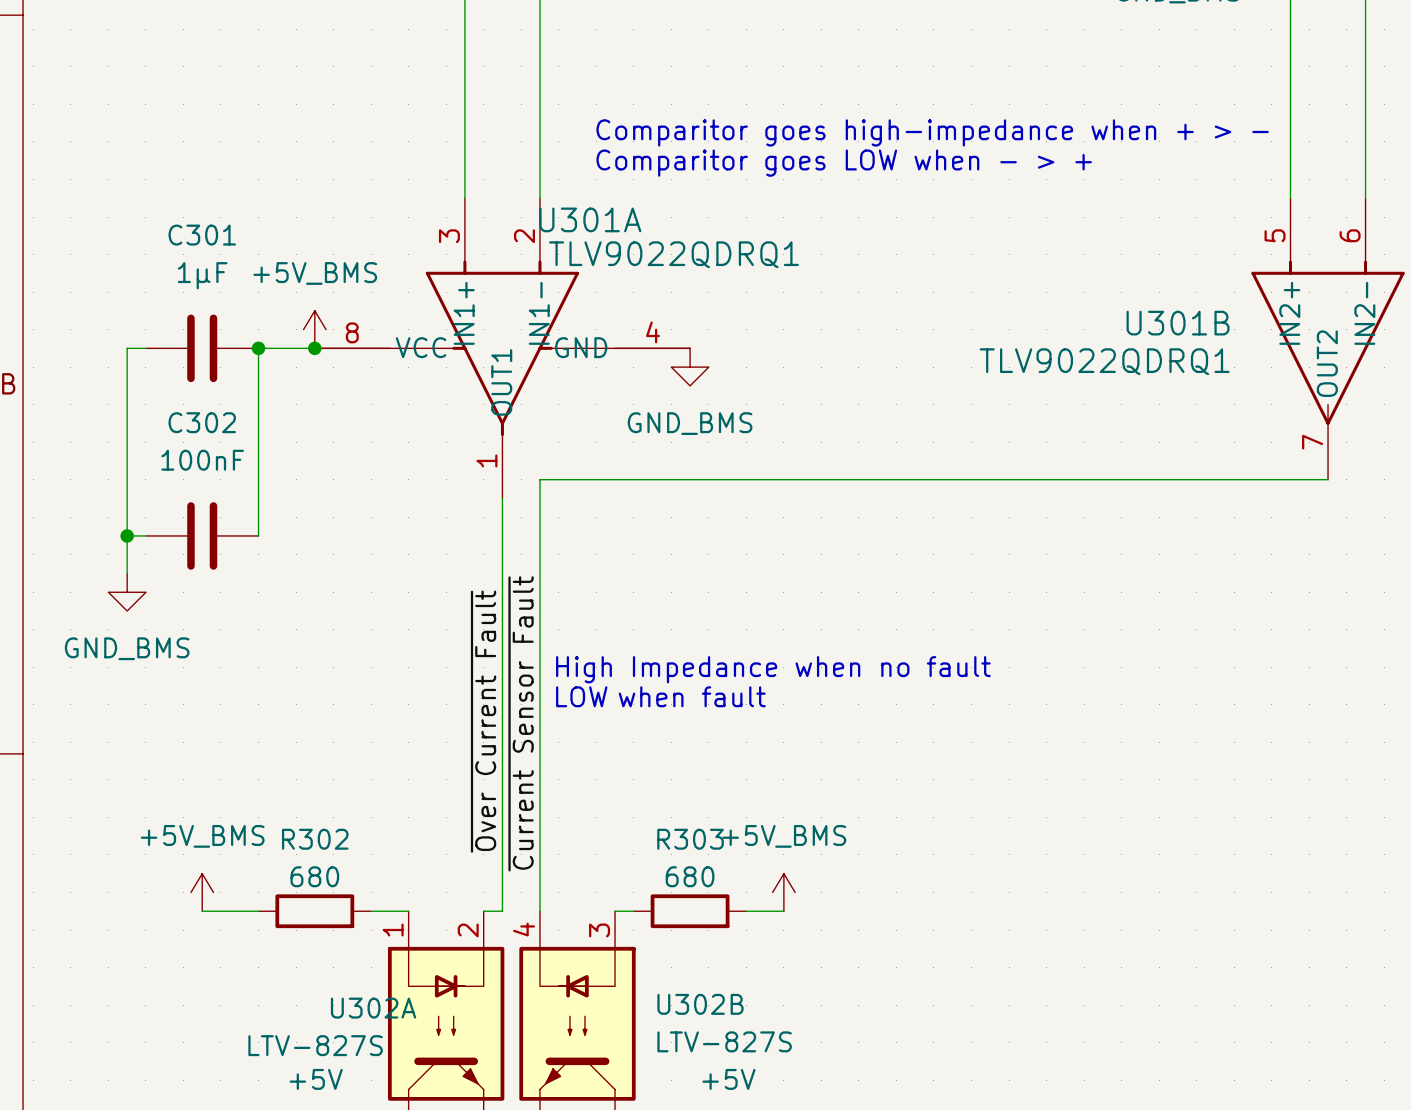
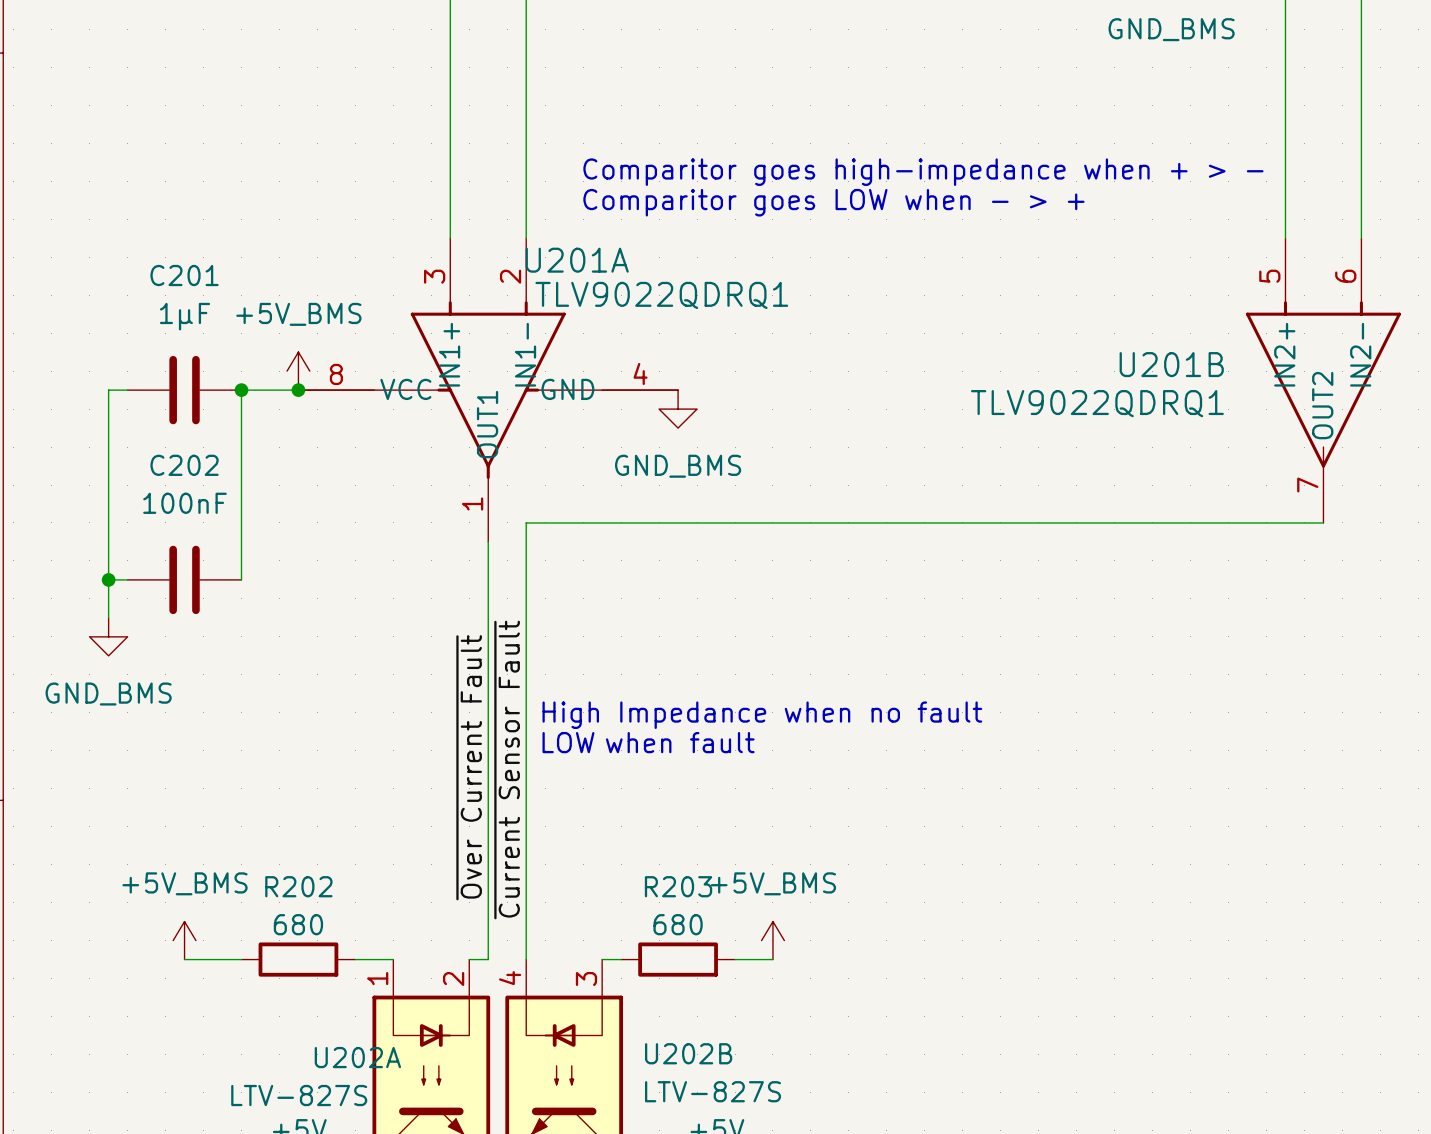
U301A name: U301A (590, 219) -> U201A (577, 260)
C301 name: C301 (202, 235) -> C201 (184, 275)
U301B name: U301B (1178, 323) -> U201B (1171, 364)
C302 name: C302 (202, 422) -> C202 (184, 465)
R302 name: R302 (315, 839) -> R202 (298, 886)
R303 name: R303 (690, 839) -> R203 (678, 886)
U302B name: U302B (700, 1004) -> U202B (688, 1053)
U302A name: U302A (373, 1008) -> U202A (357, 1057)

